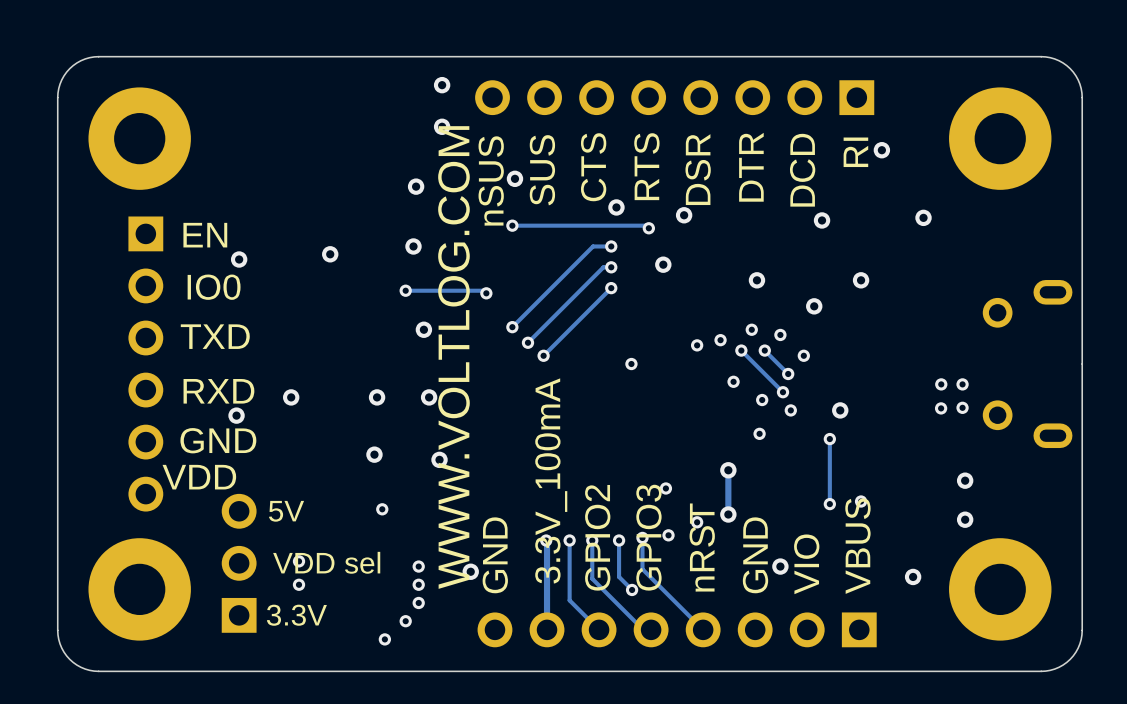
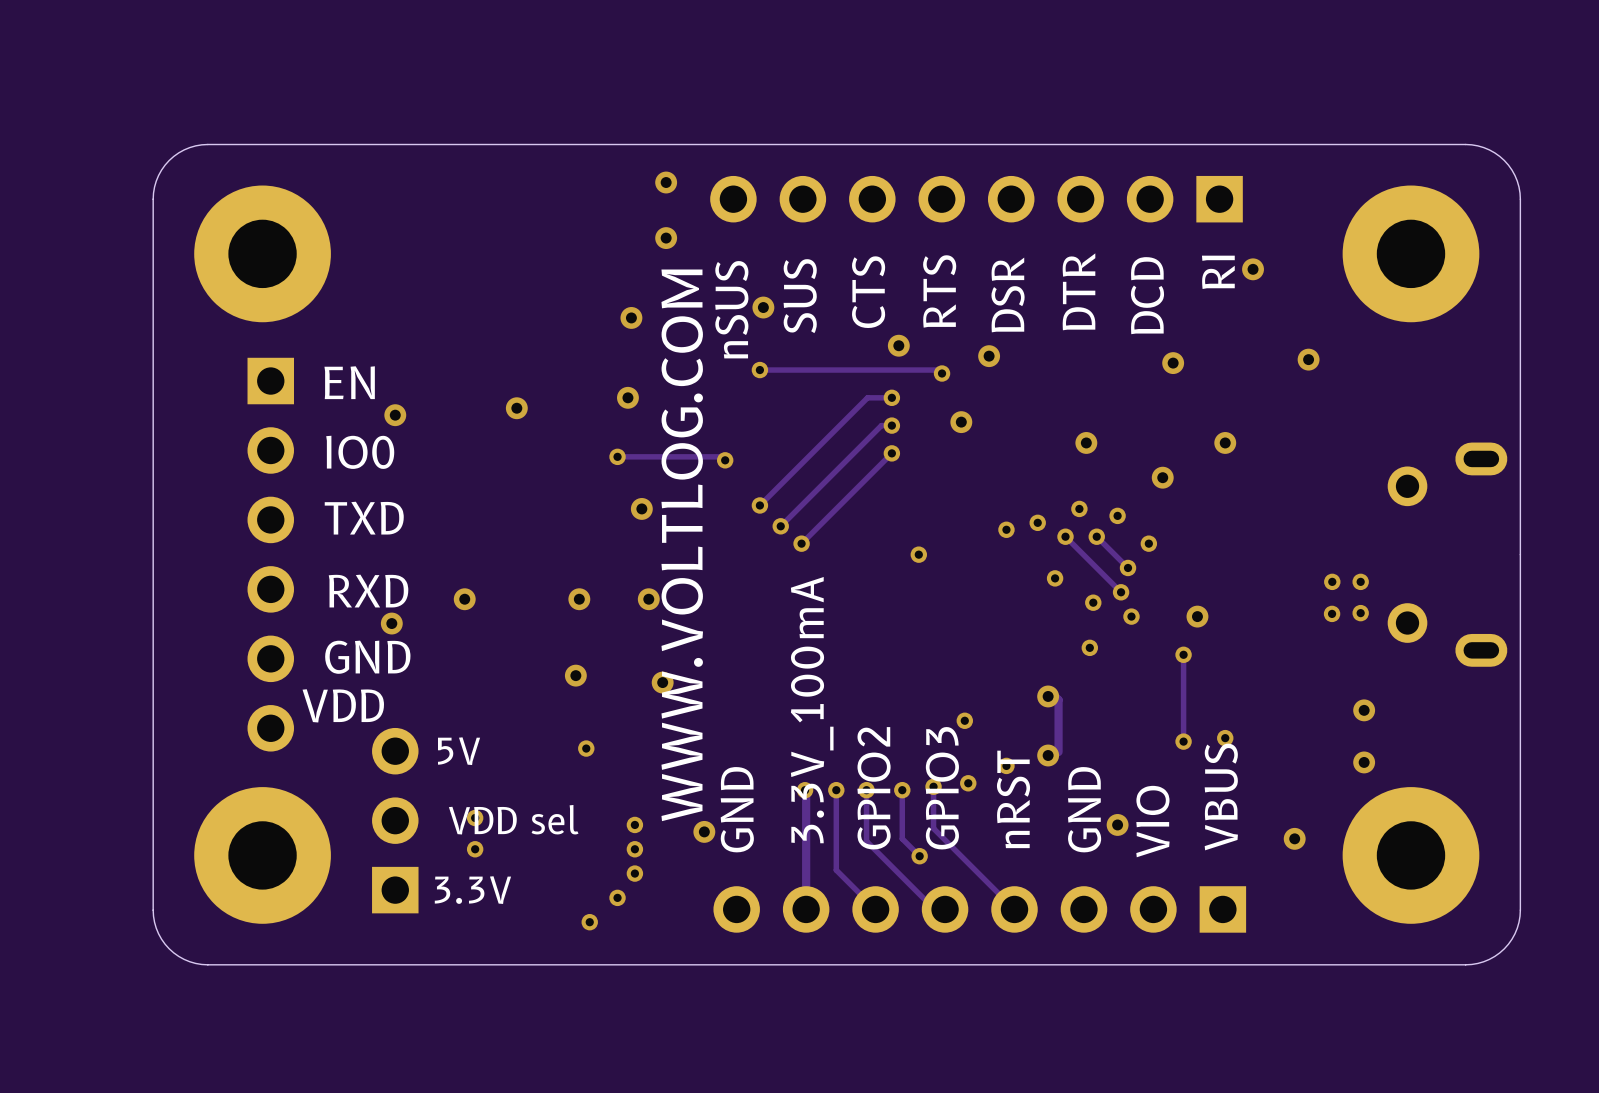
track: (728, 470) (728, 511) -> none
track: none -> (1055, 696) (1058, 699) (1058, 752)

